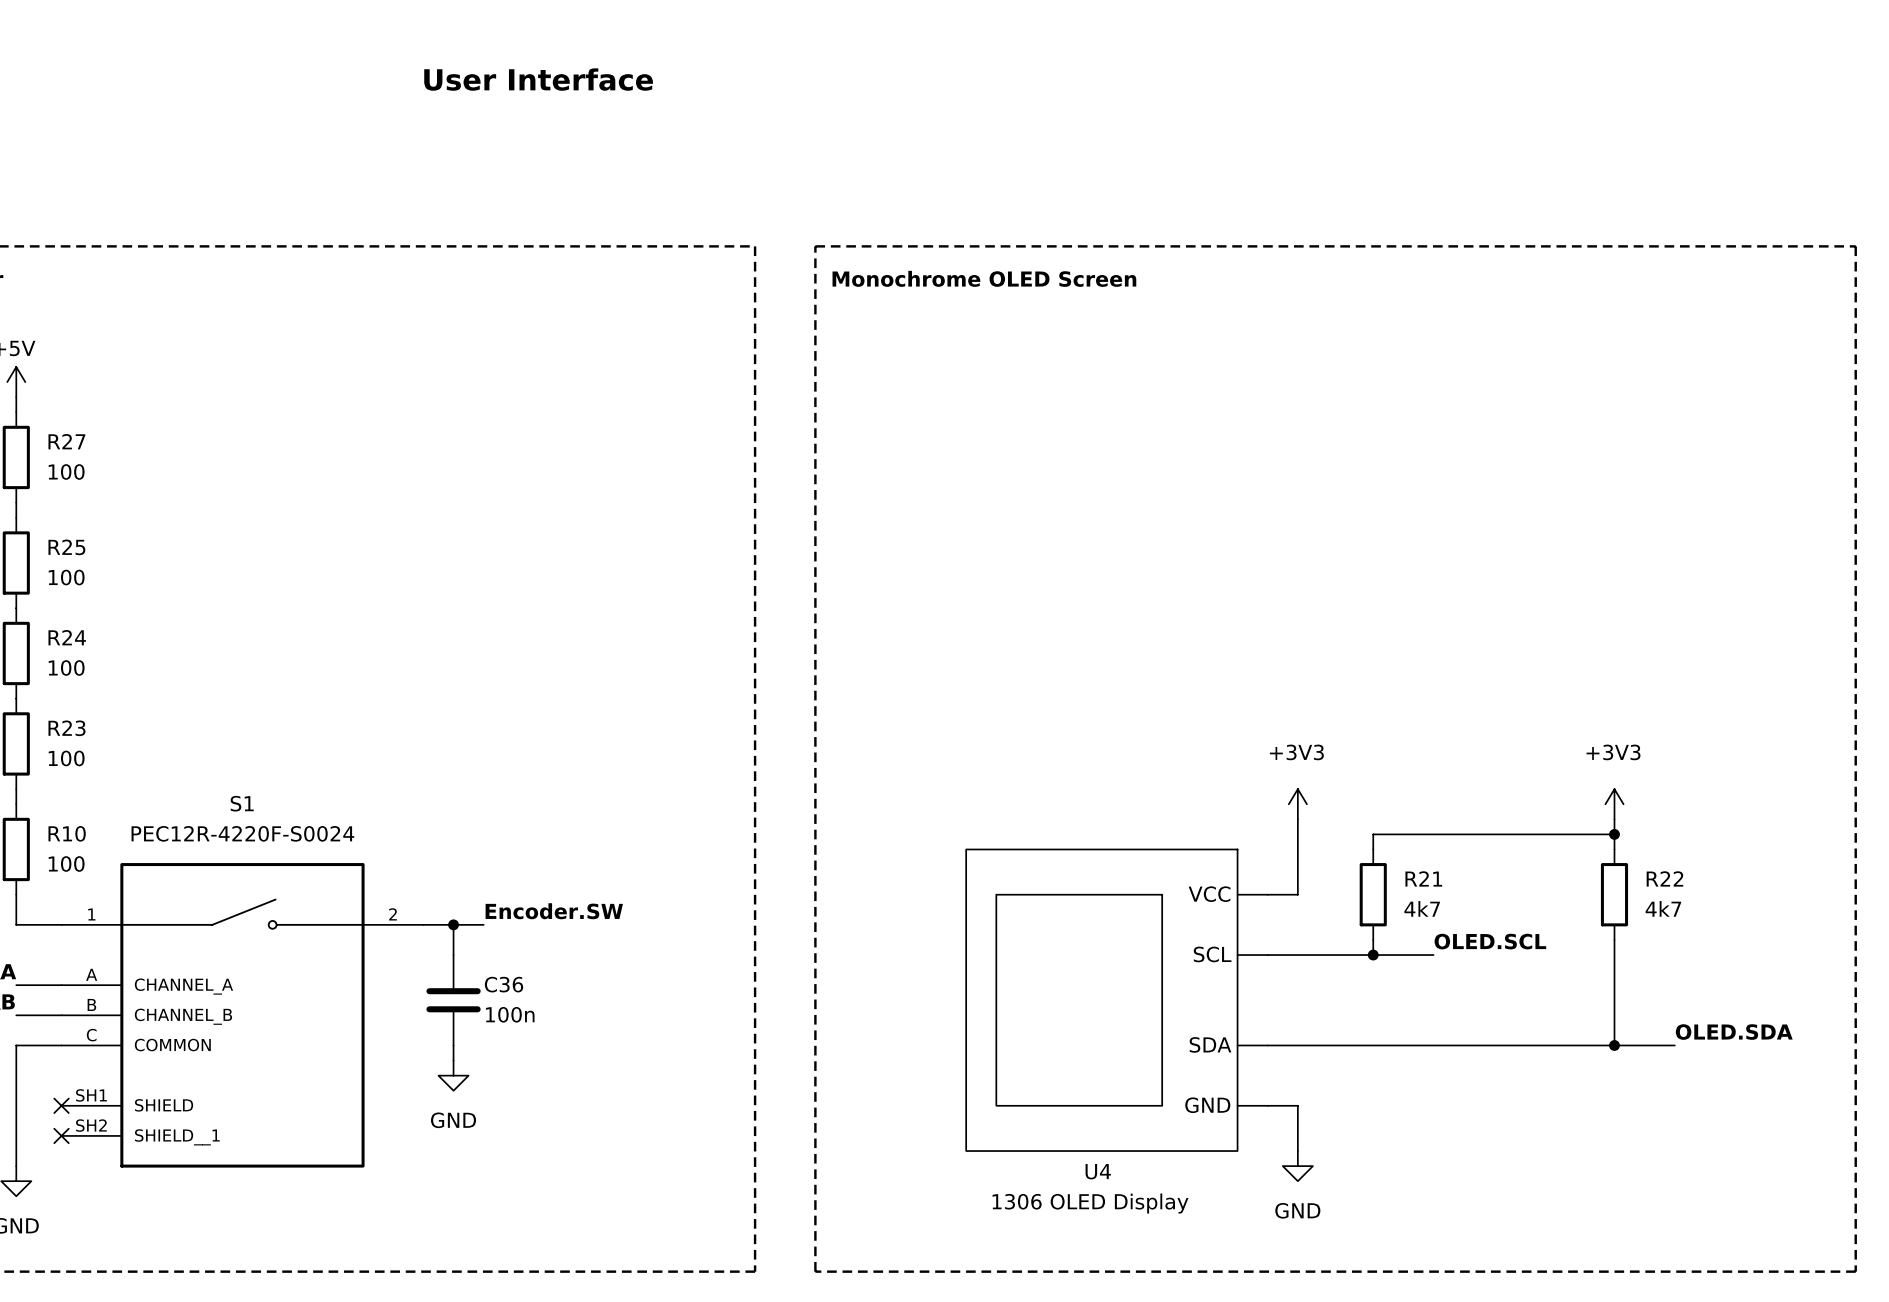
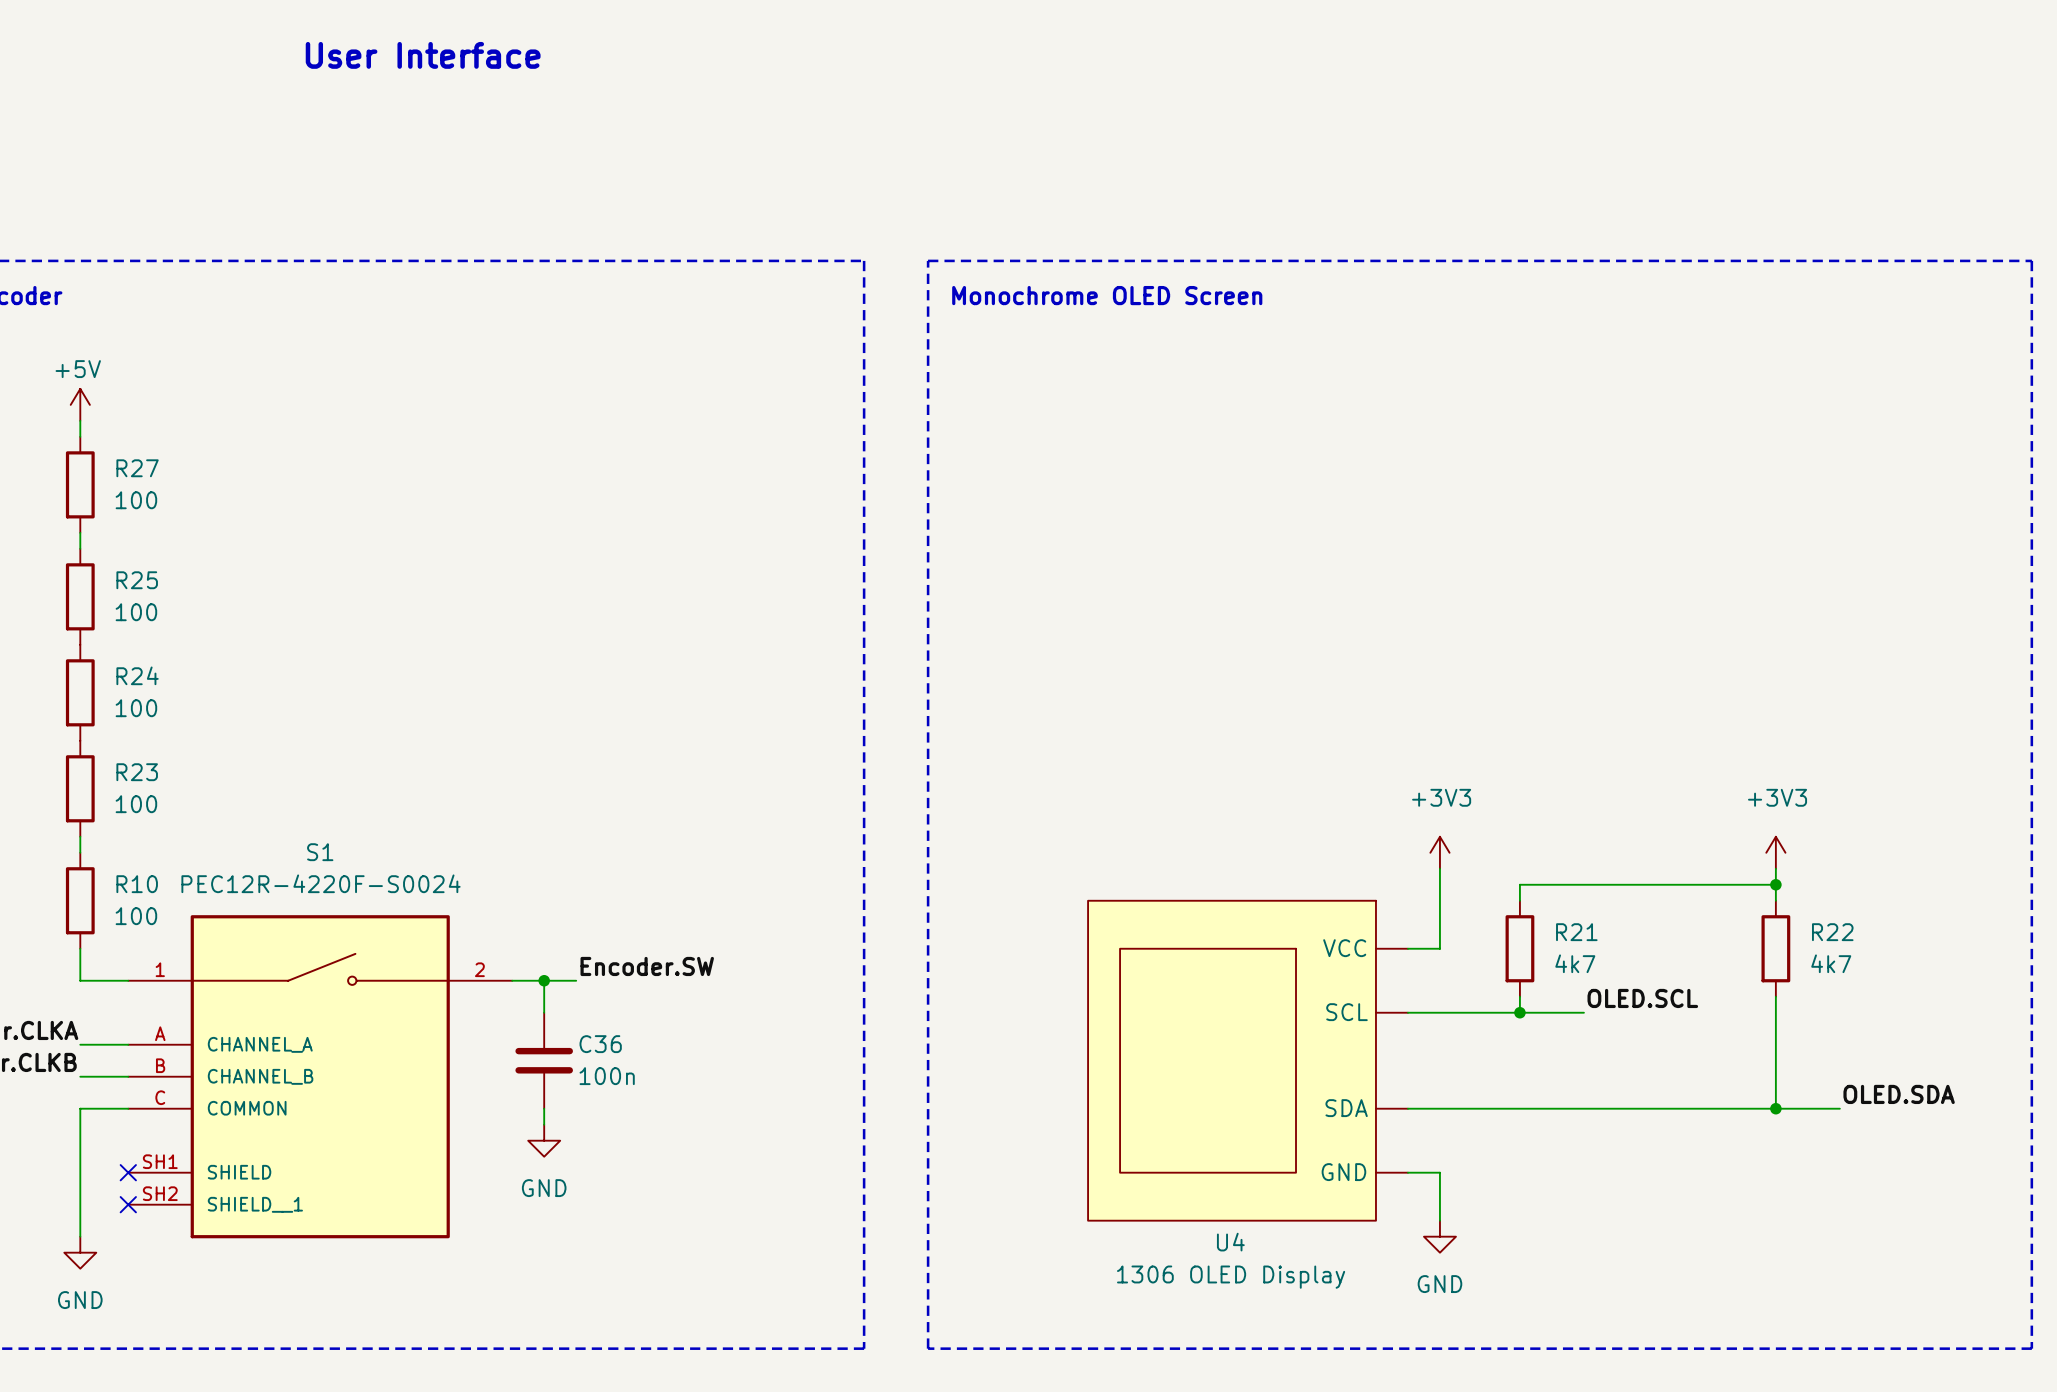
text position: User Interface (538, 79) -> User Interface (423, 55)

